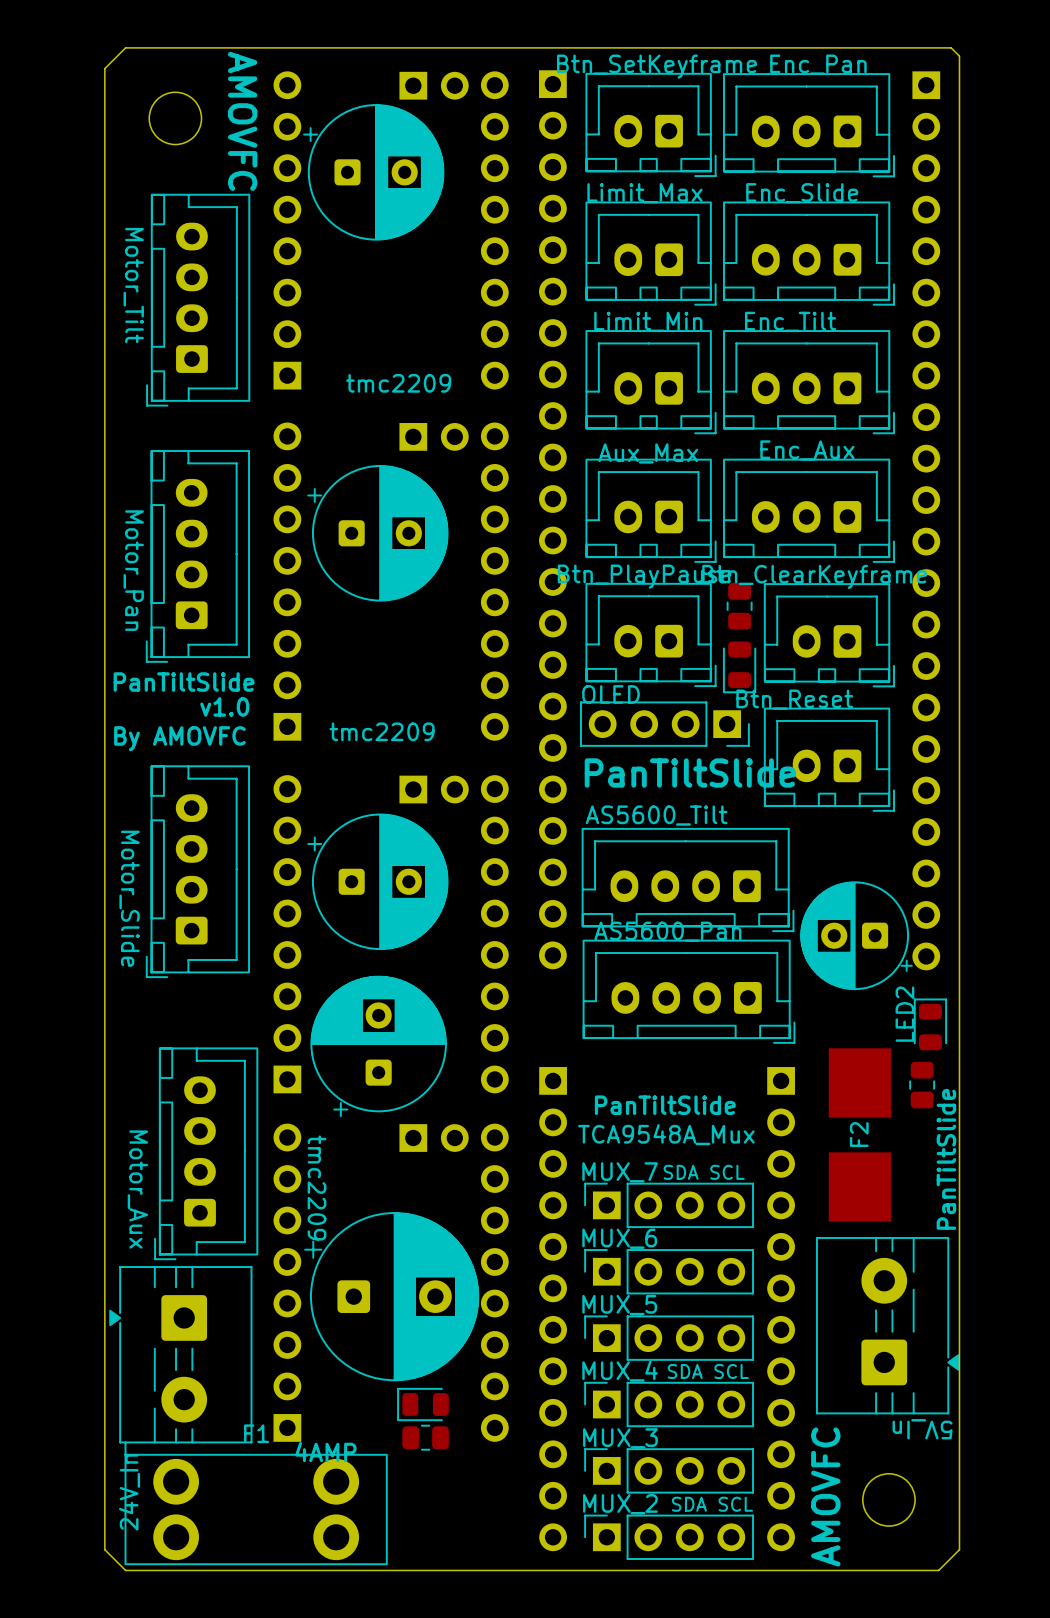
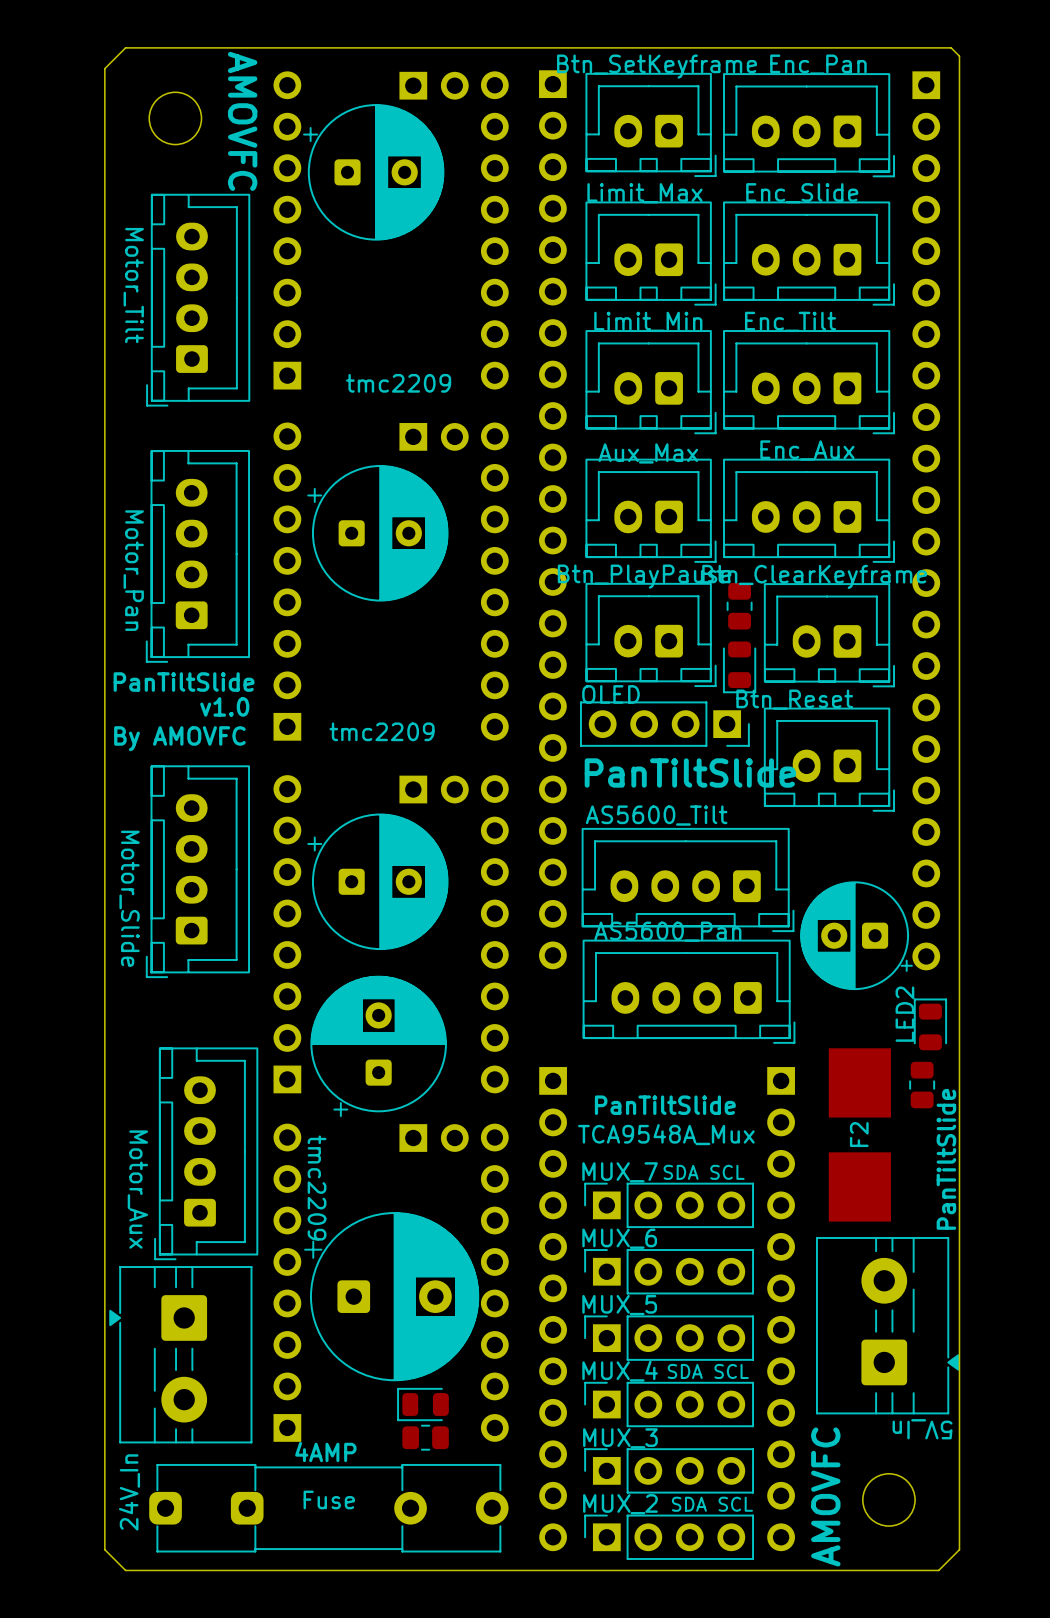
F1: (256, 1503) -> none
part: none -> Fuse (328, 1508)

